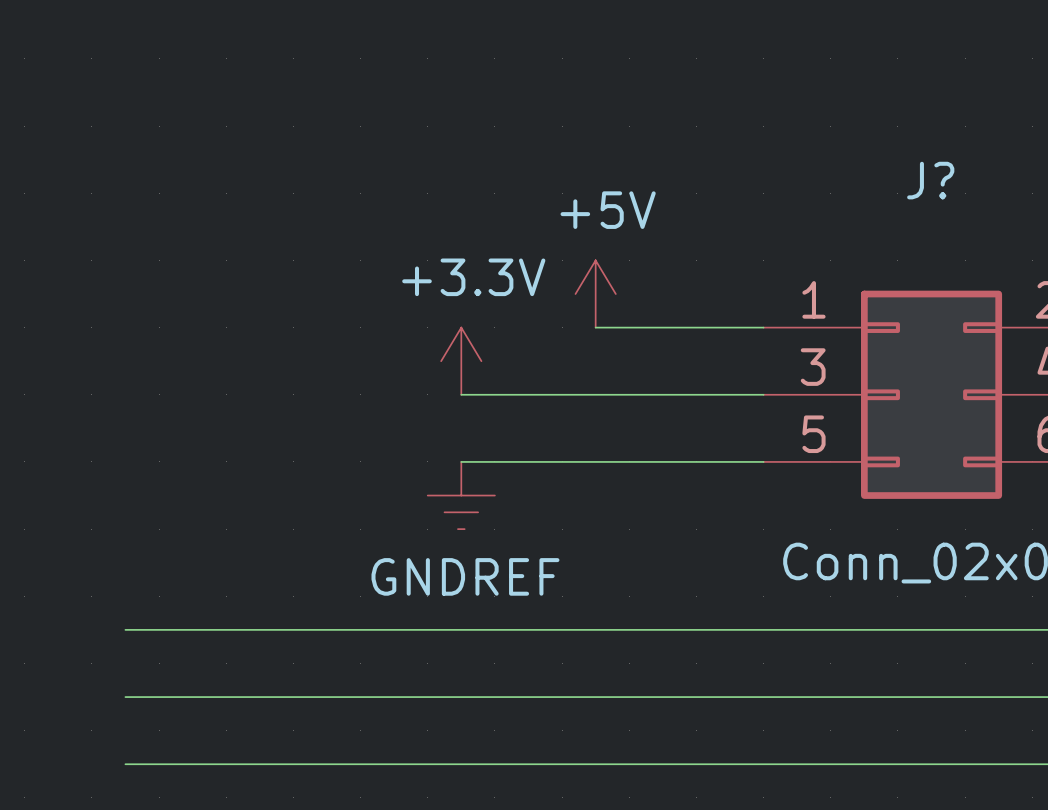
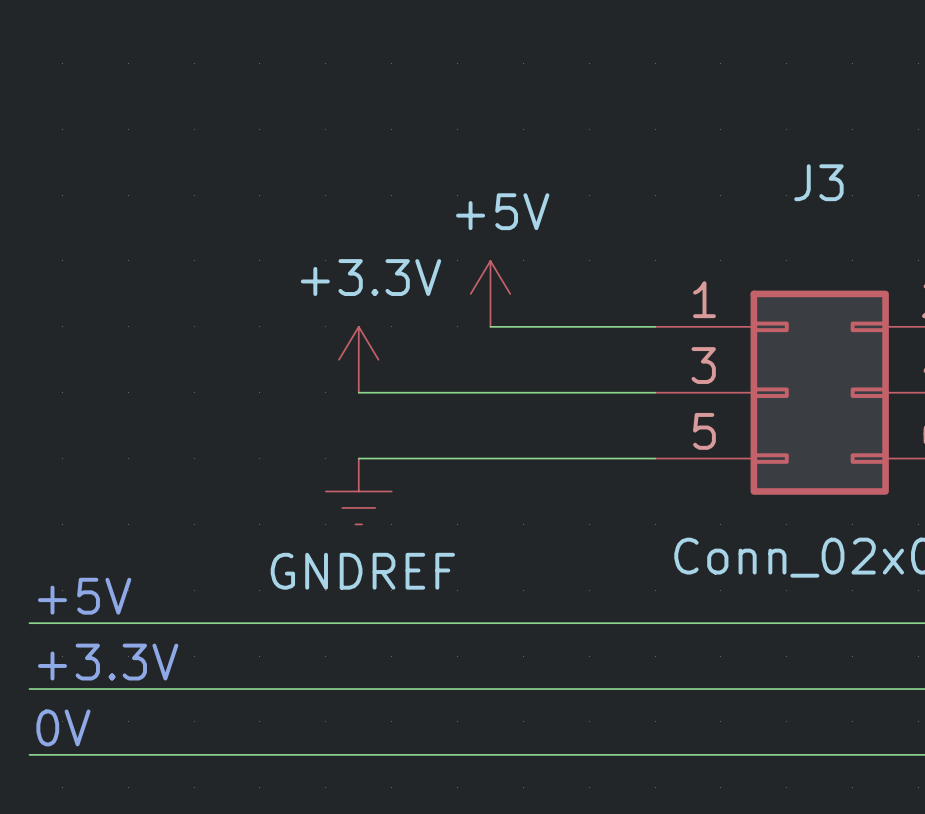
J? name: J? (930, 180) -> J3 (818, 182)
text: none -> +5V (84, 596)
text: none -> +3.3V (108, 662)
text: none -> 0V (63, 727)

